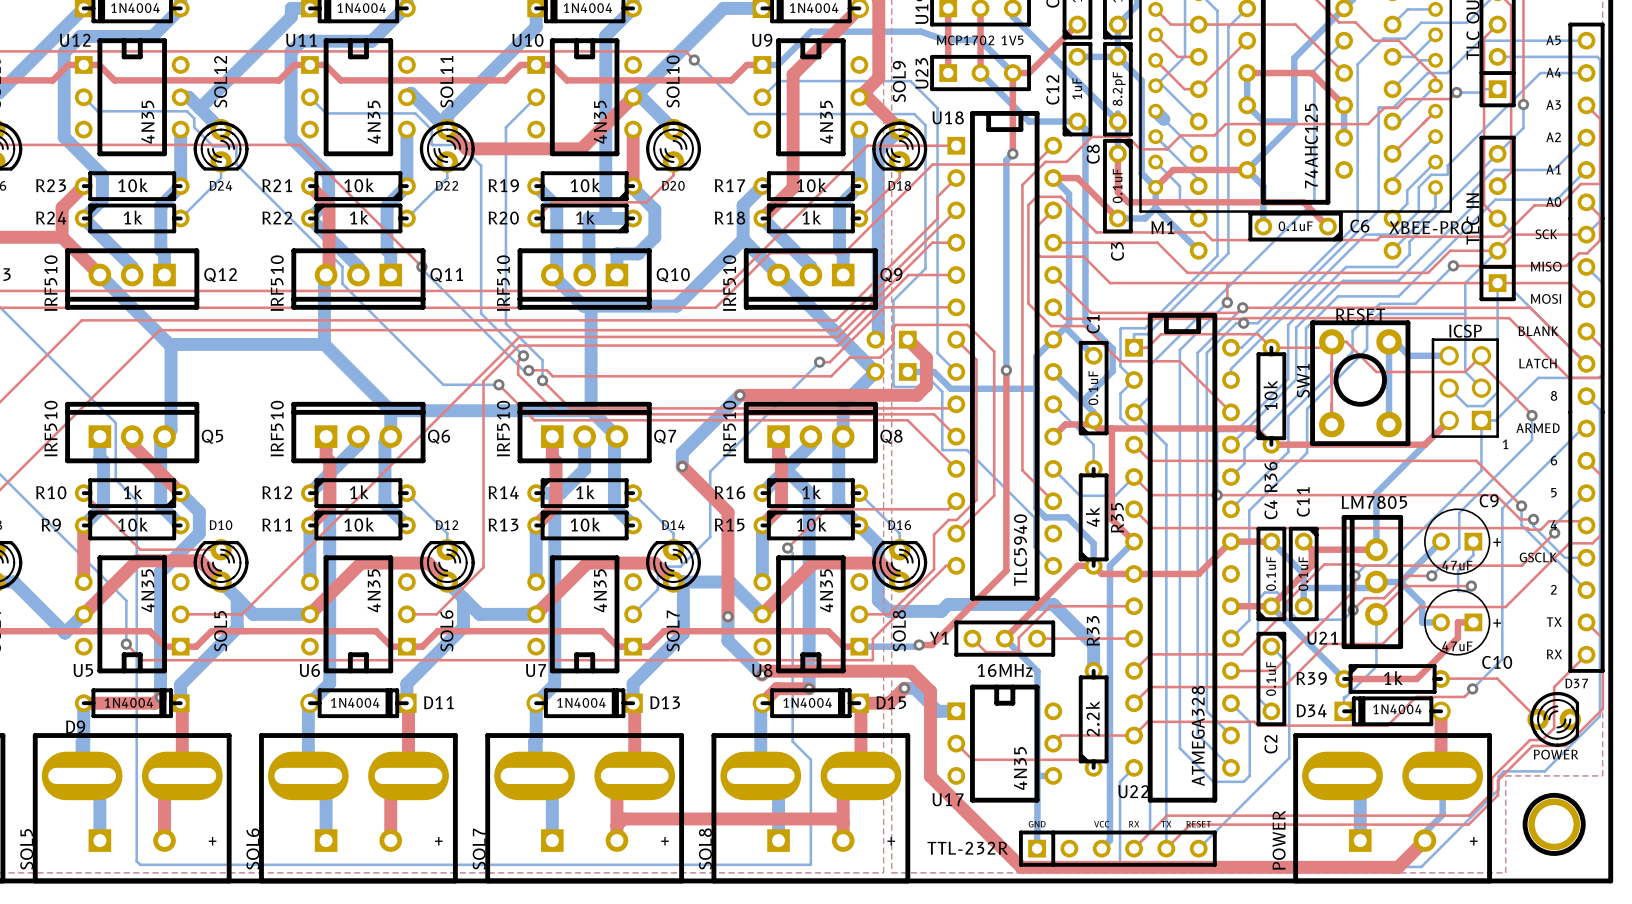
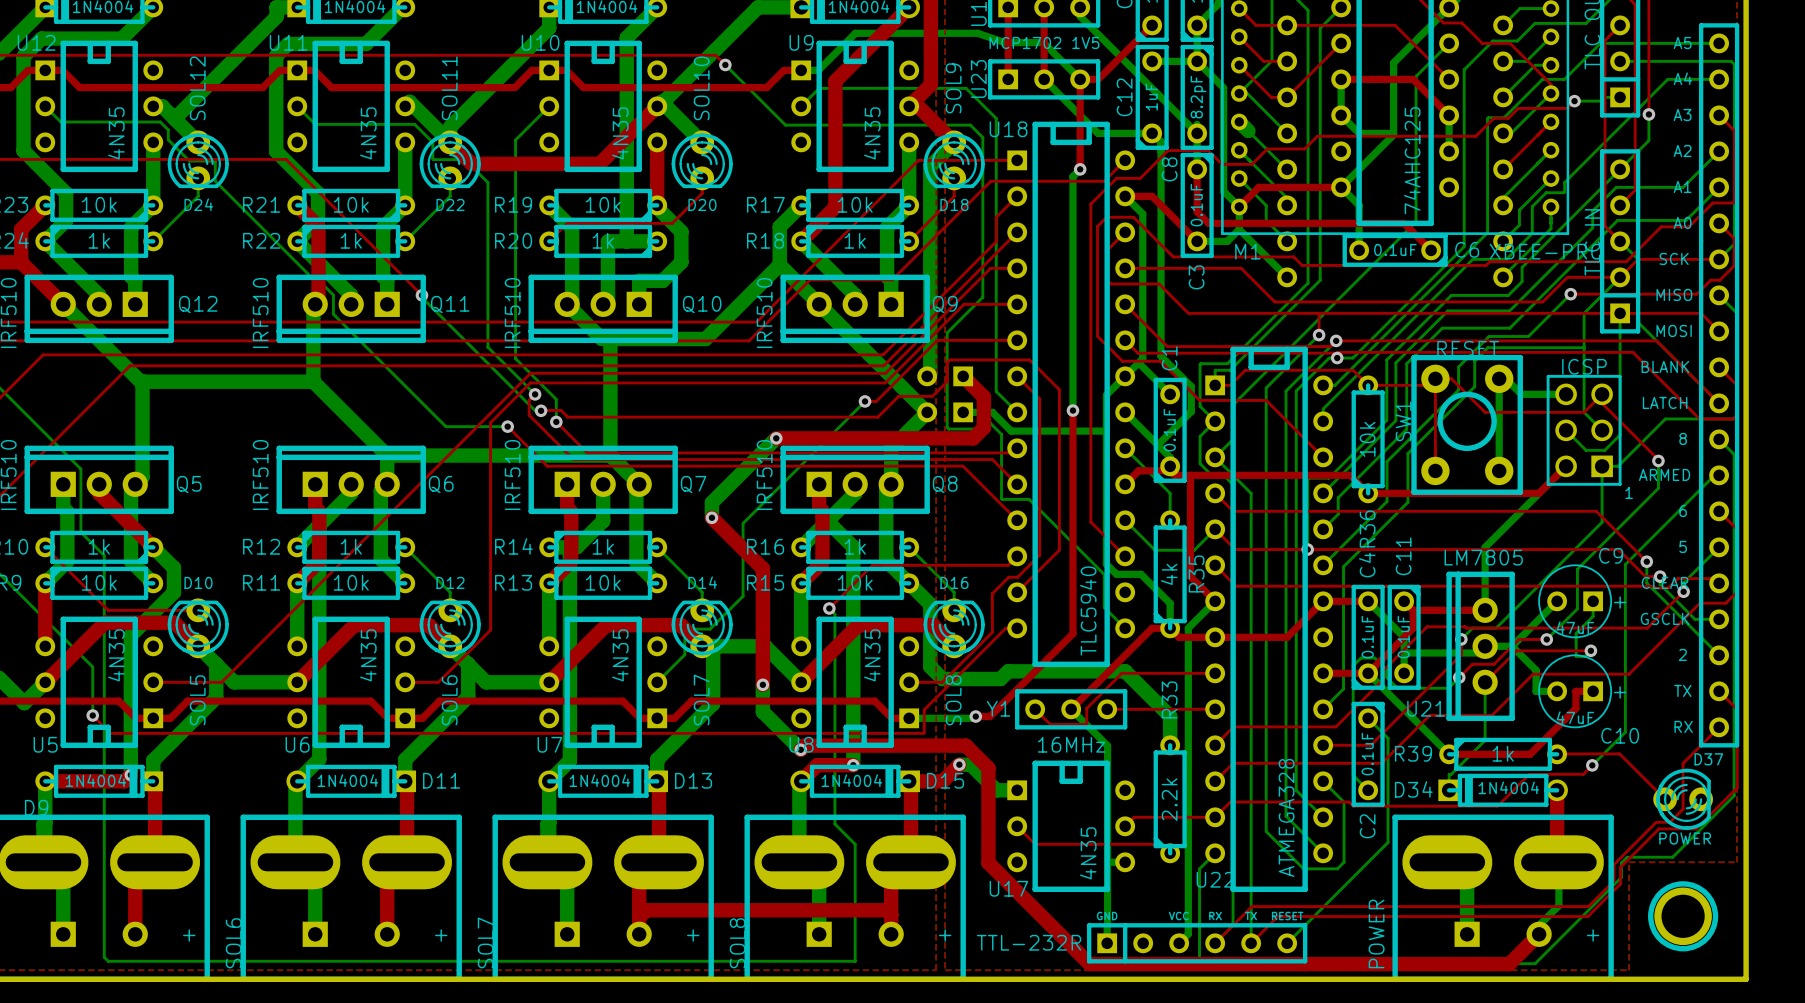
text: none -> CLEAR (1665, 582)
text: 4 (1553, 525) -> none

